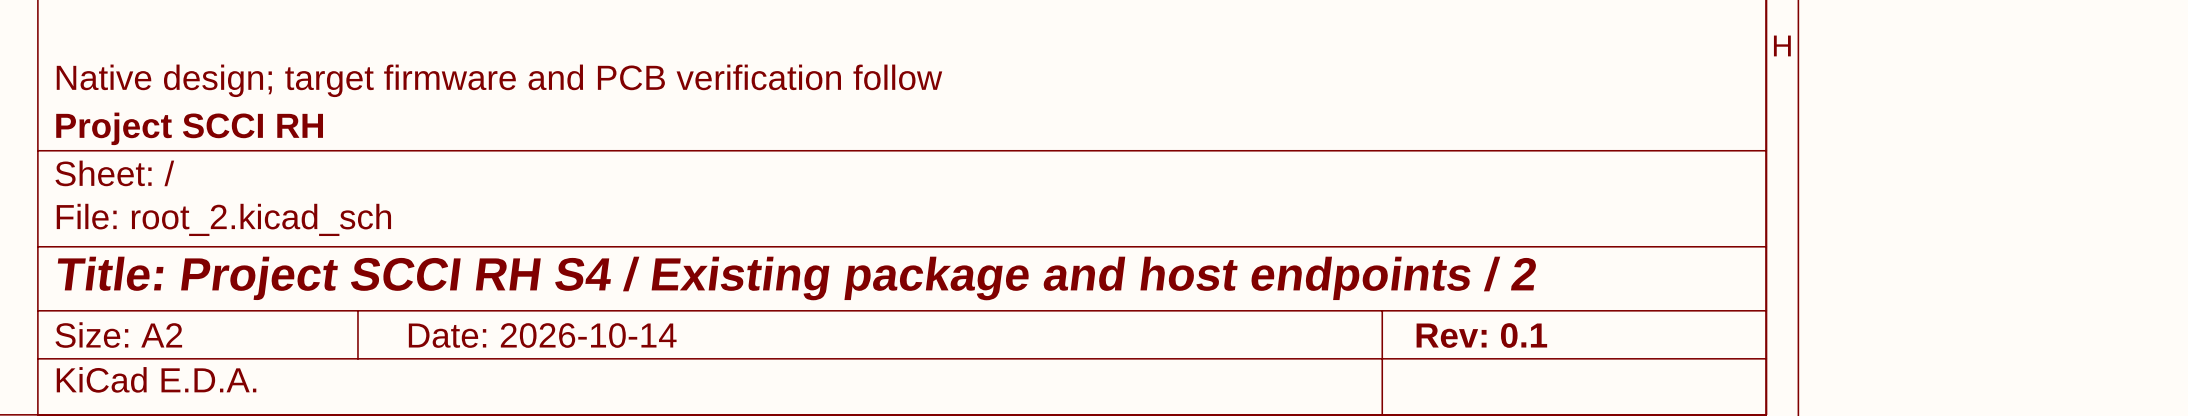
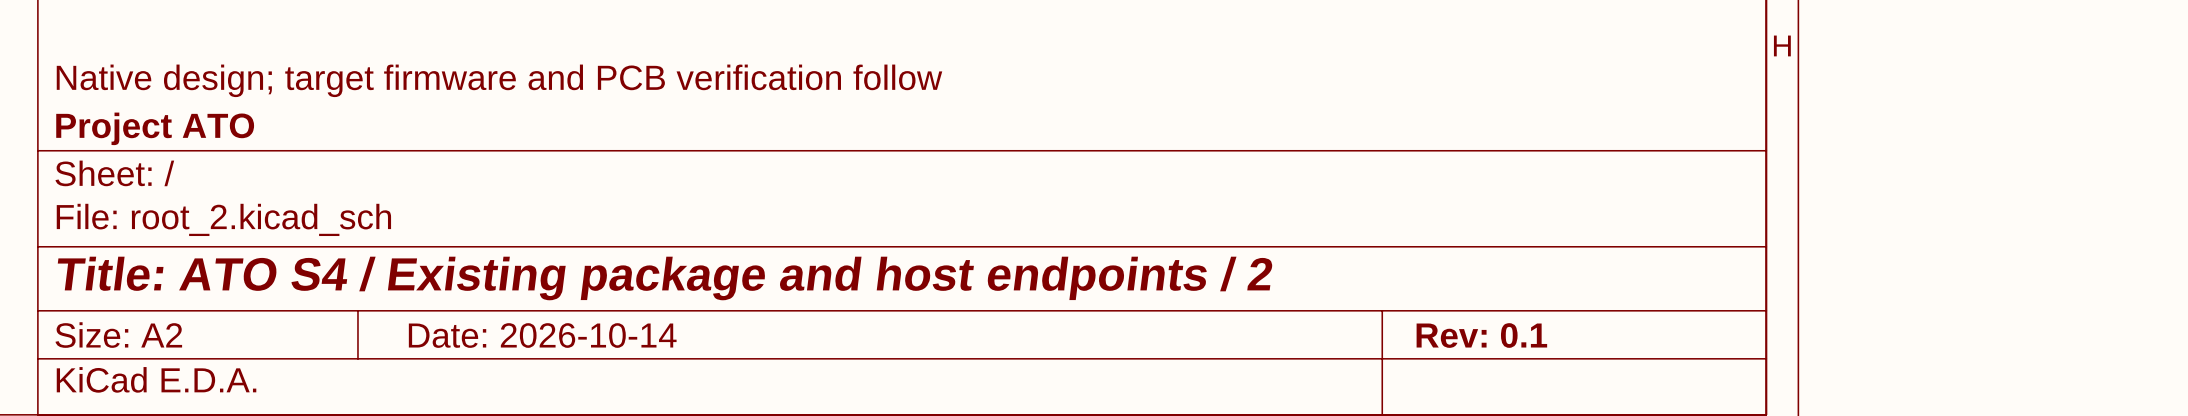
title block: Project SCCI RH (189, 128) -> Project ATO (155, 128)
title block: Title: Project SCCI RH S4 / Existing package and host endpoints / 2 (797, 278) -> Title: ATO S4 / Existing package and host endpoints / 2 (665, 278)

